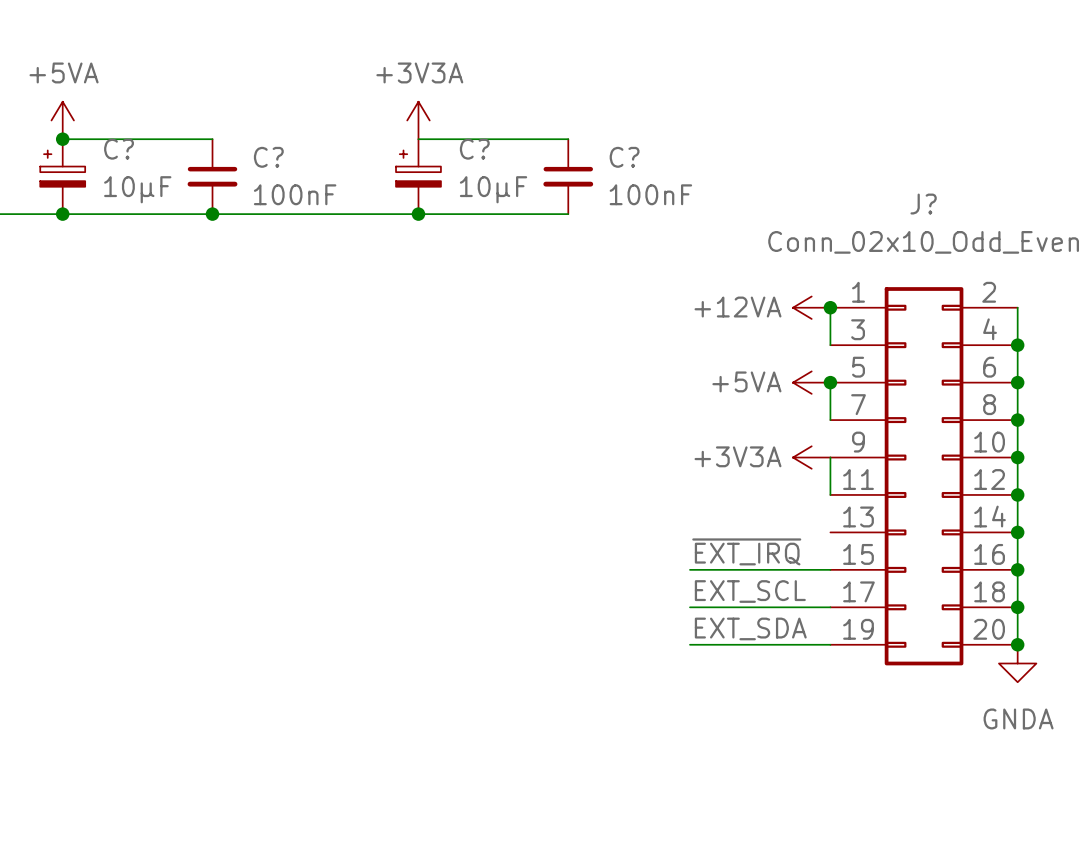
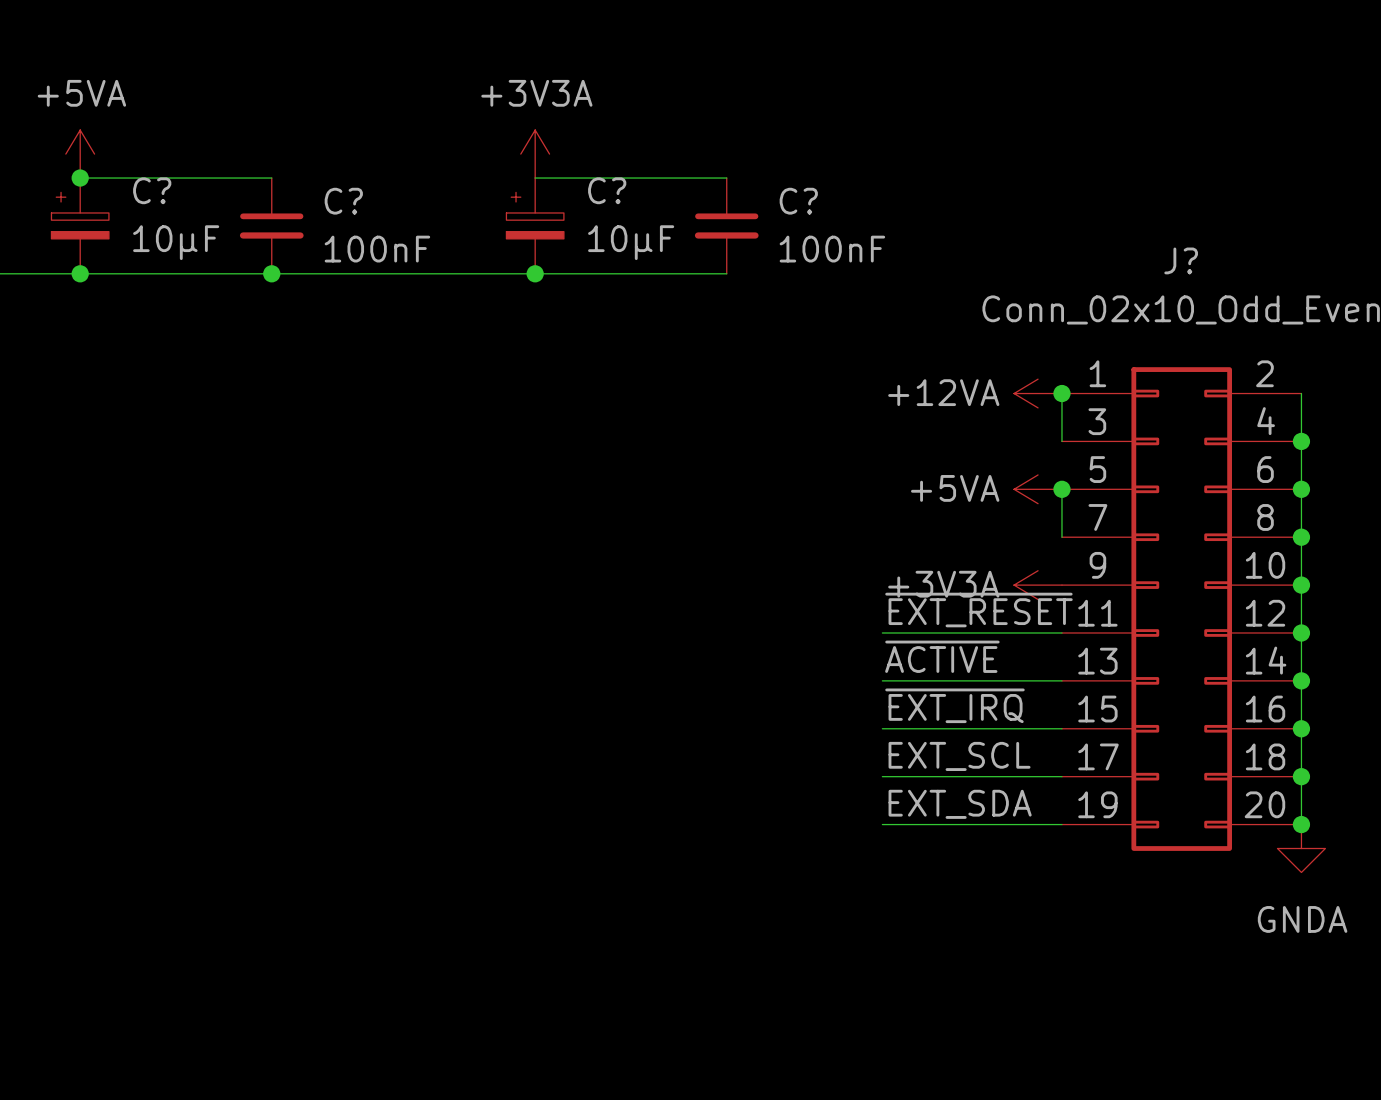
wire: (830, 457) (830, 494) -> (882, 632) (1061, 632)
label: none -> ~{EXT_RESET} (978, 610)
label: none -> ~{ACTIVE} (942, 656)
wire: none -> (882, 680) (1061, 680)

